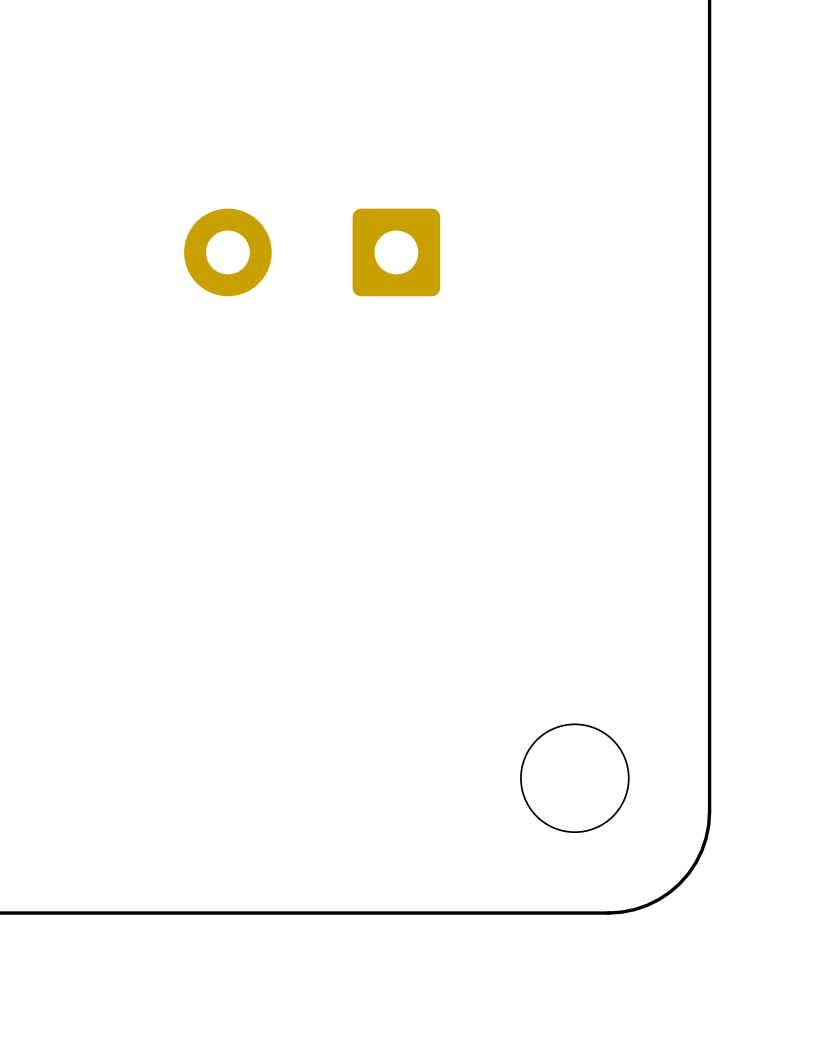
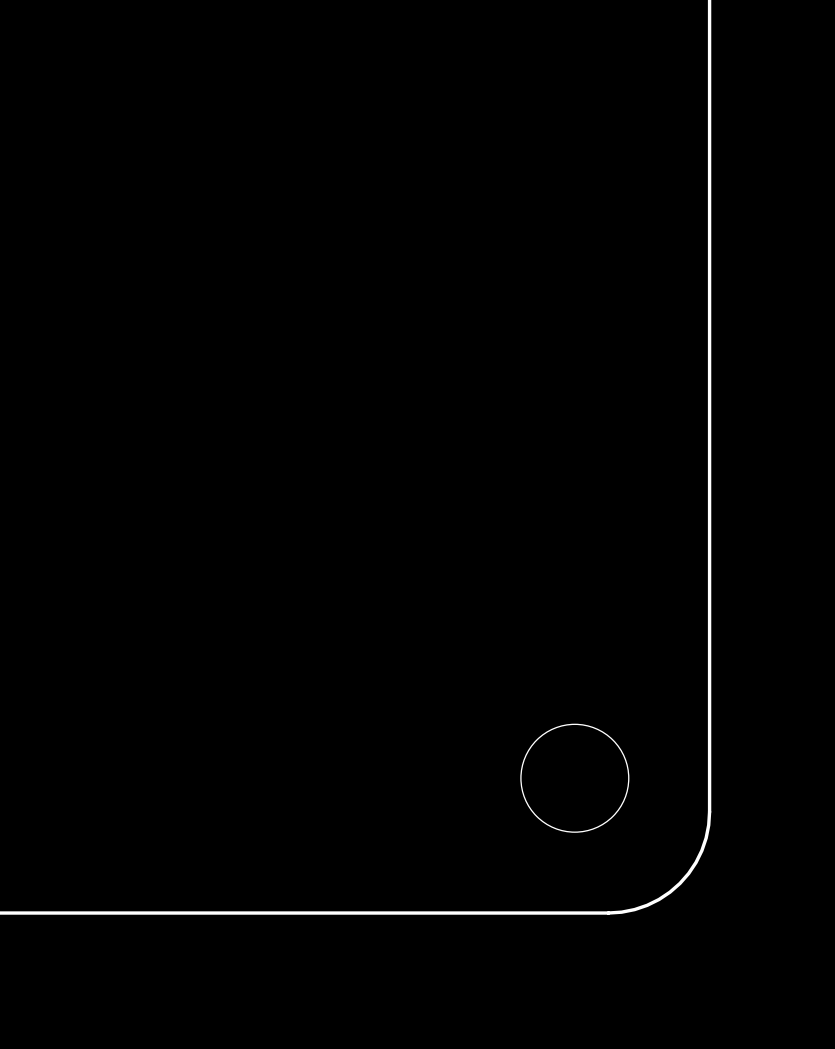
part: (312, 252) -> none

